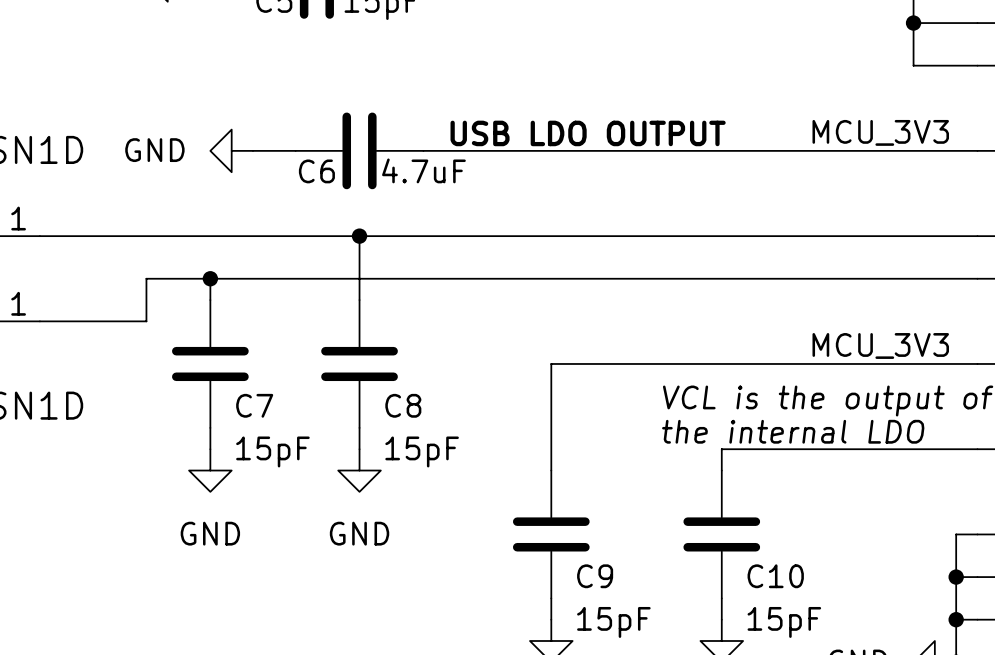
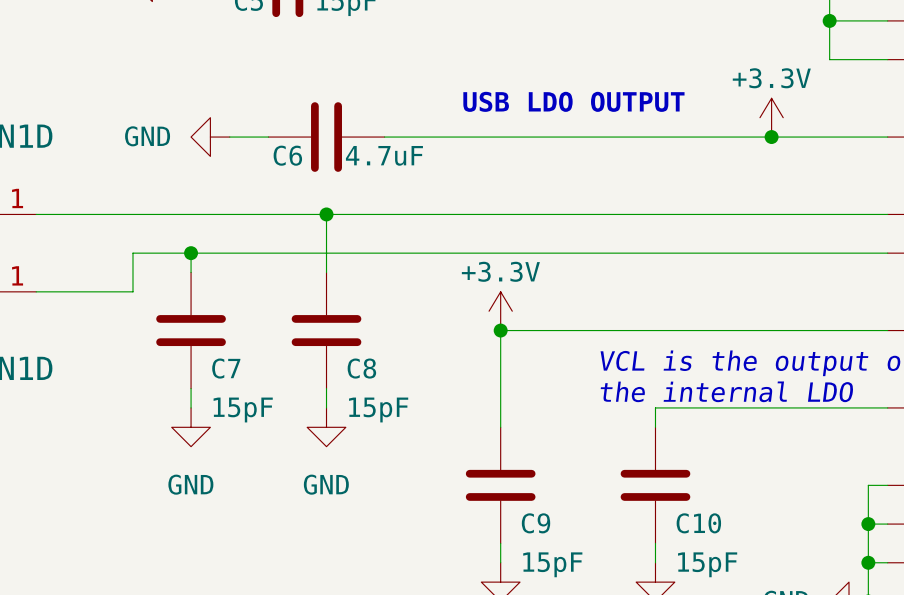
power symbol: none -> +3.3V (771, 117)
label: MCU_3V3 (880, 132) -> none
text position: USB LDO OUTPUT (588, 133) -> USB LDO OUTPUT (573, 101)
junction: none -> (771, 137)
power symbol: none -> +3.3V (500, 311)
label: MCU_3V3 (880, 345) -> none
junction: none -> (500, 330)

